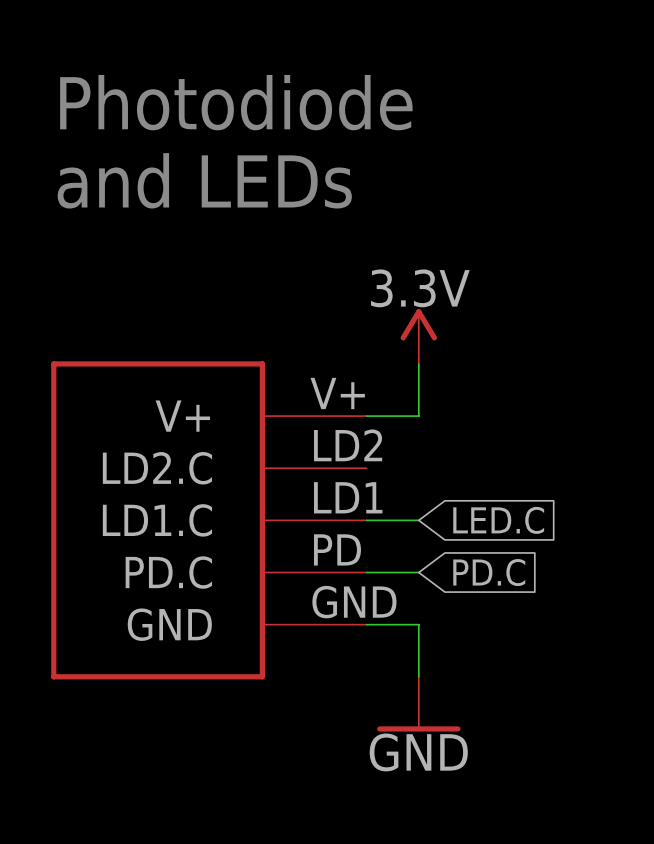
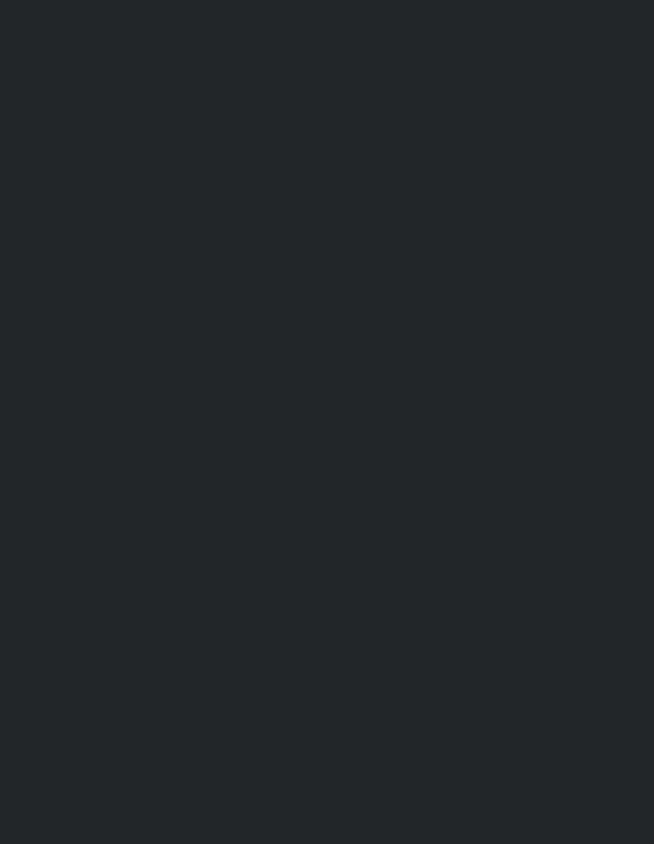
text: Photodiode (236, 102) -> none
text: and LEDs (204, 180) -> none
power symbol: 3.3V (418, 336) -> none
wire: (418, 363) (418, 416) (366, 416) -> none
part: (208, 520) -> none
wire: (366, 520) (418, 520) -> none
global label: LED.C (498, 520) -> none
wire: (366, 572) (418, 572) -> none
global label: PD.C (489, 572) -> none
wire: (366, 624) (418, 624) (418, 676) -> none
power symbol: GND (418, 704) -> none

